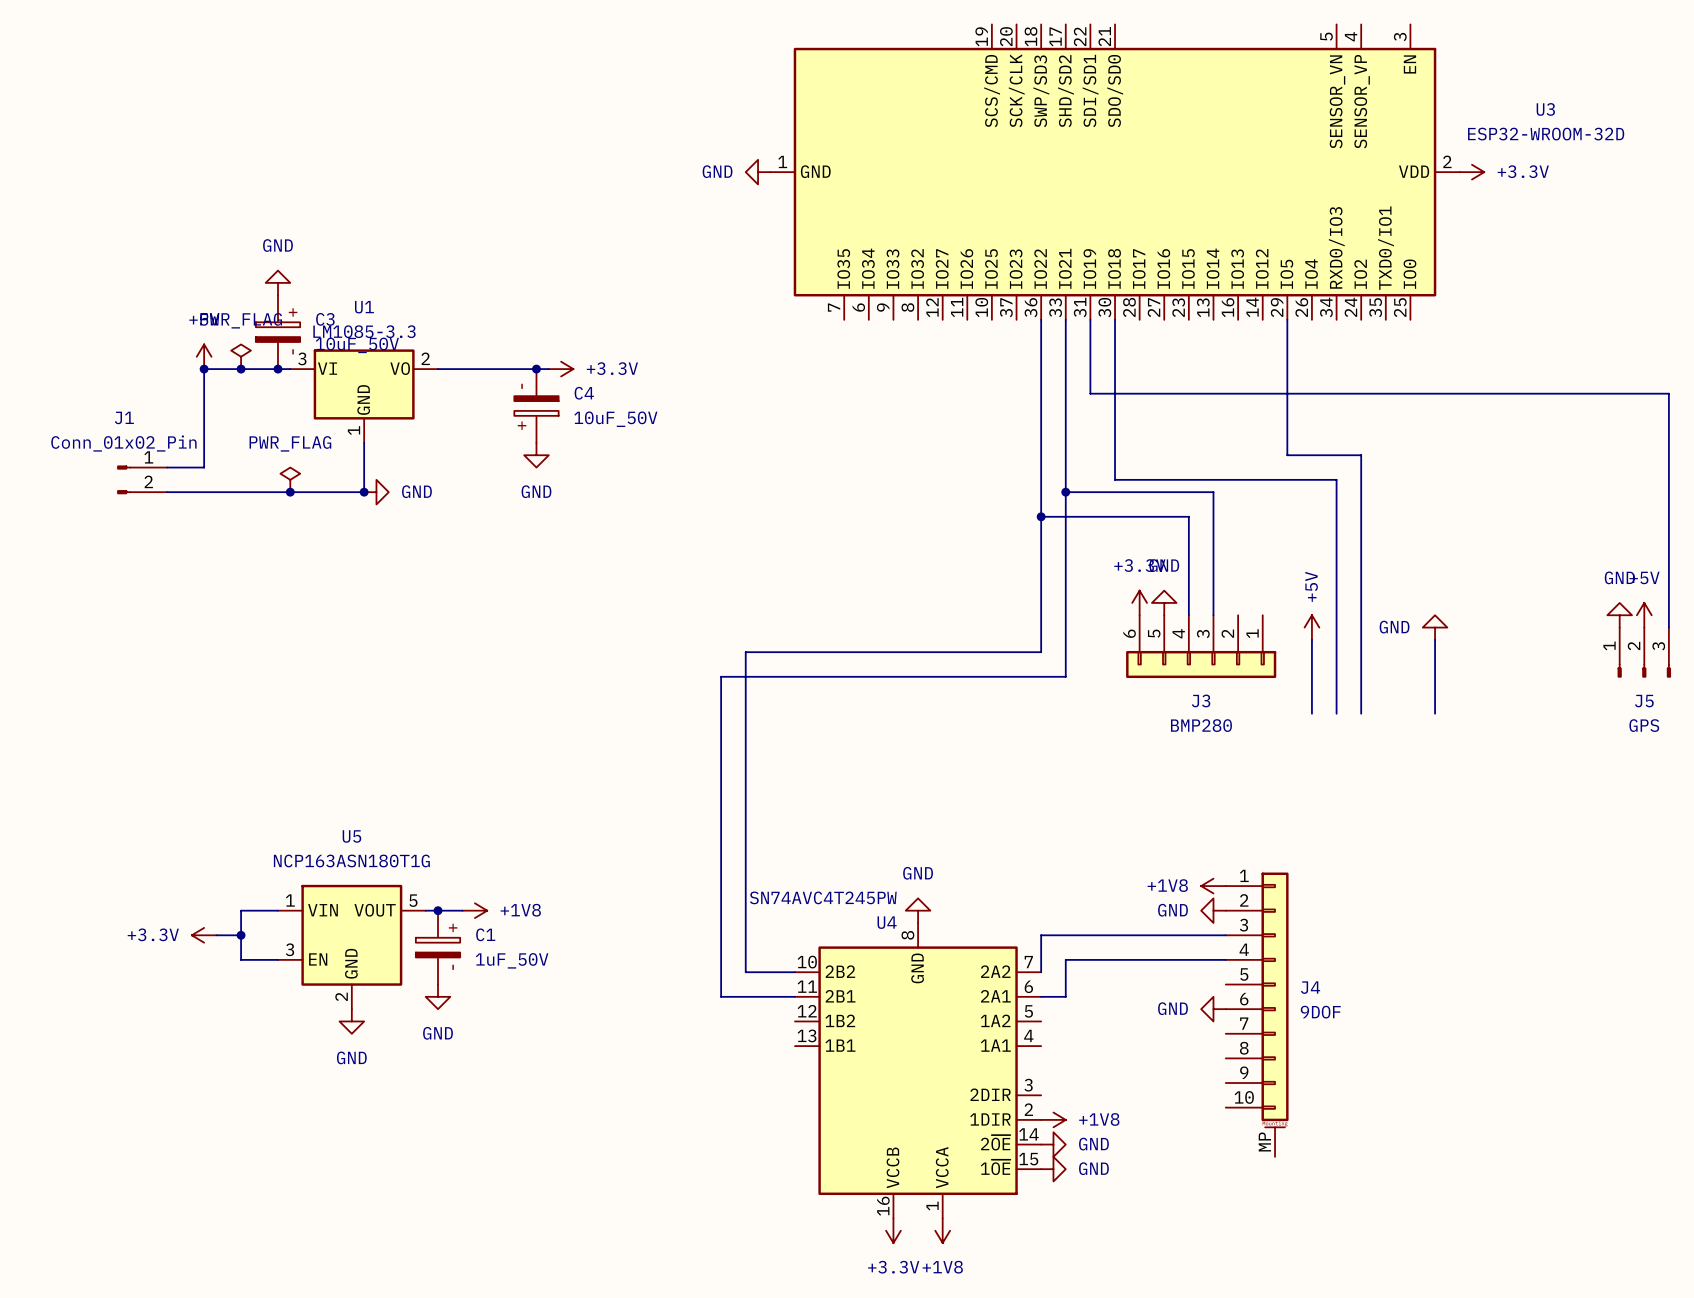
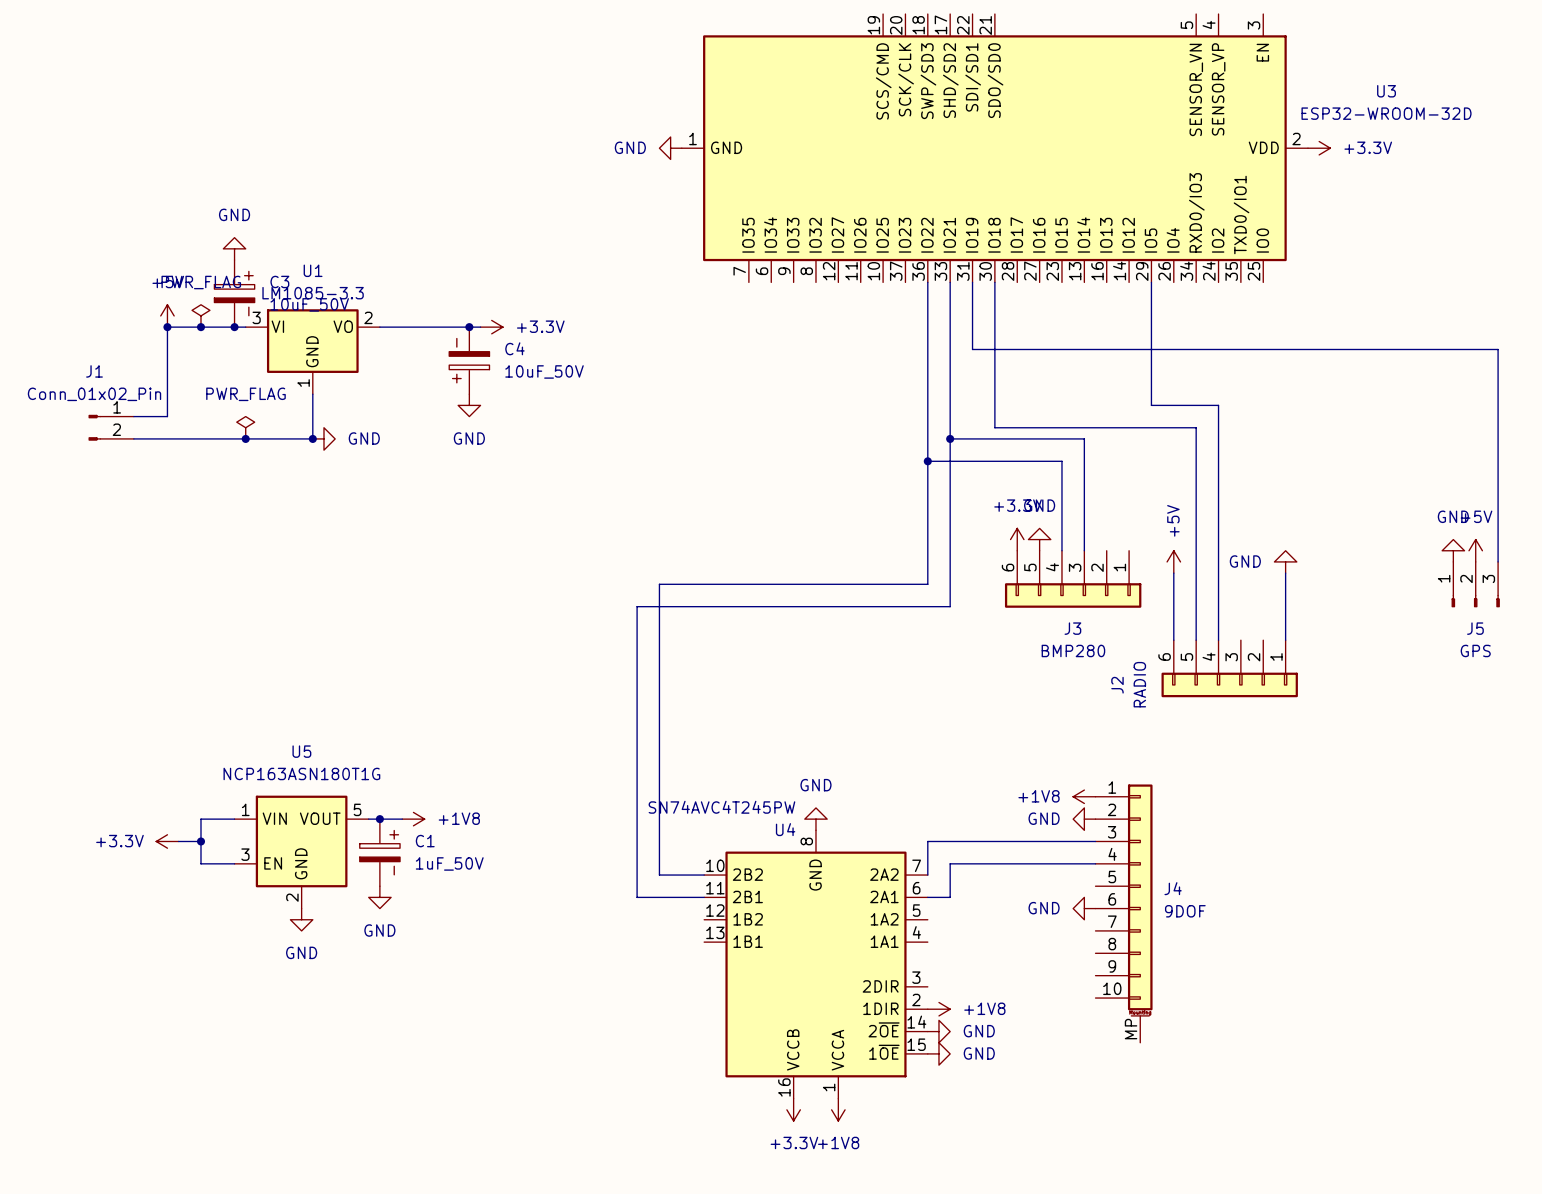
J2: none -> RADIO (1229, 668)

